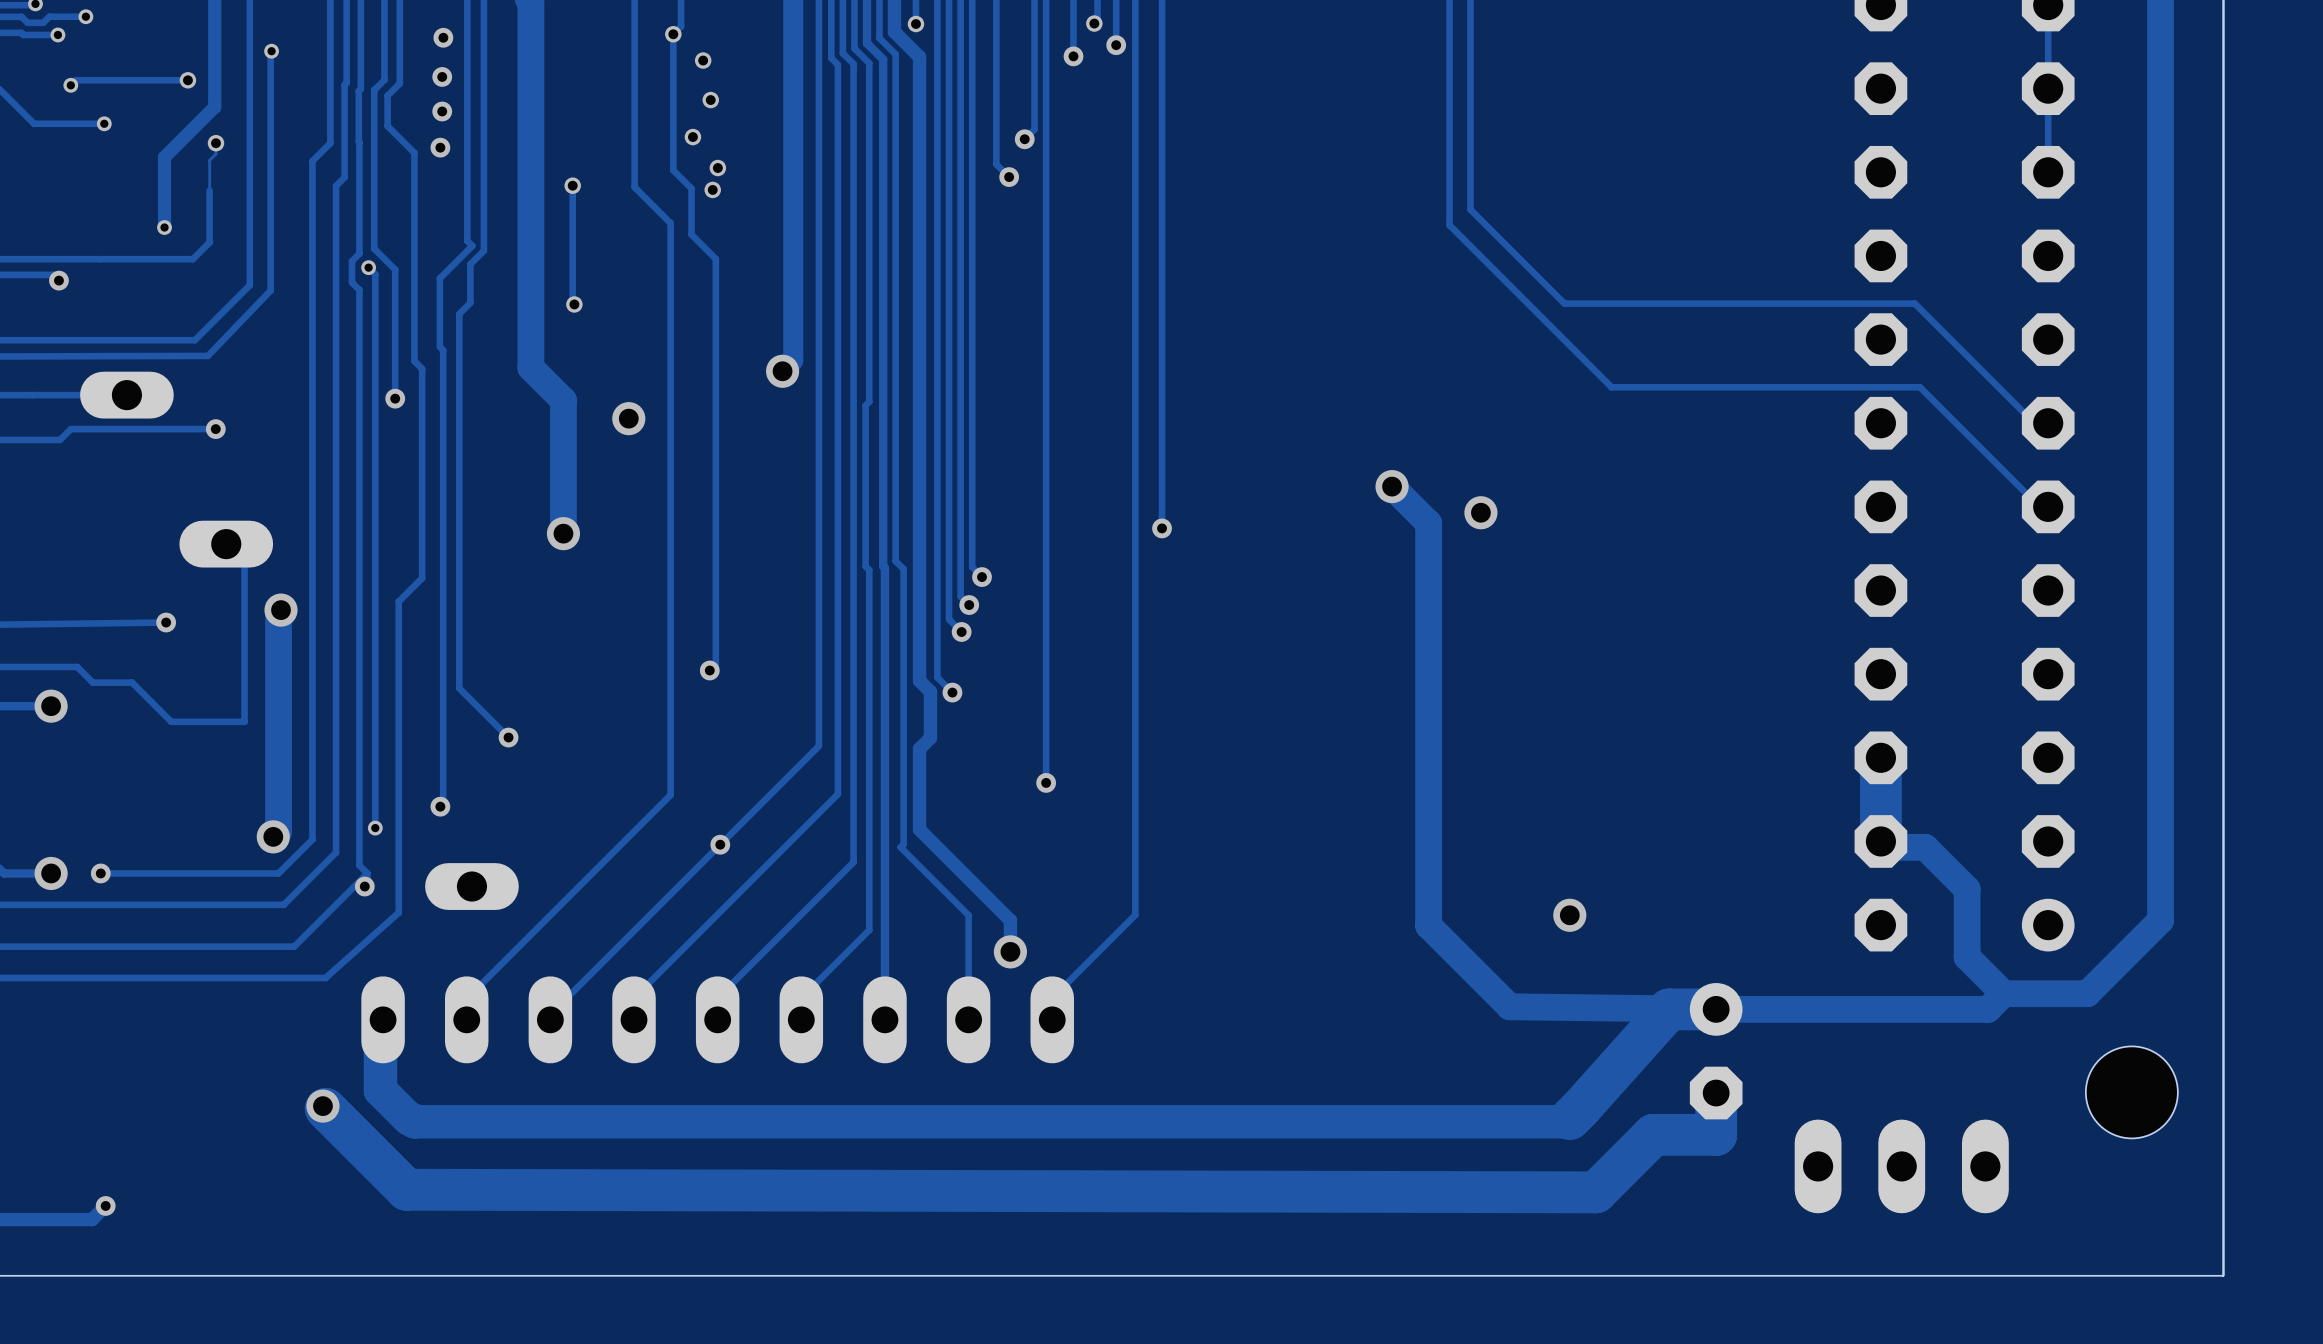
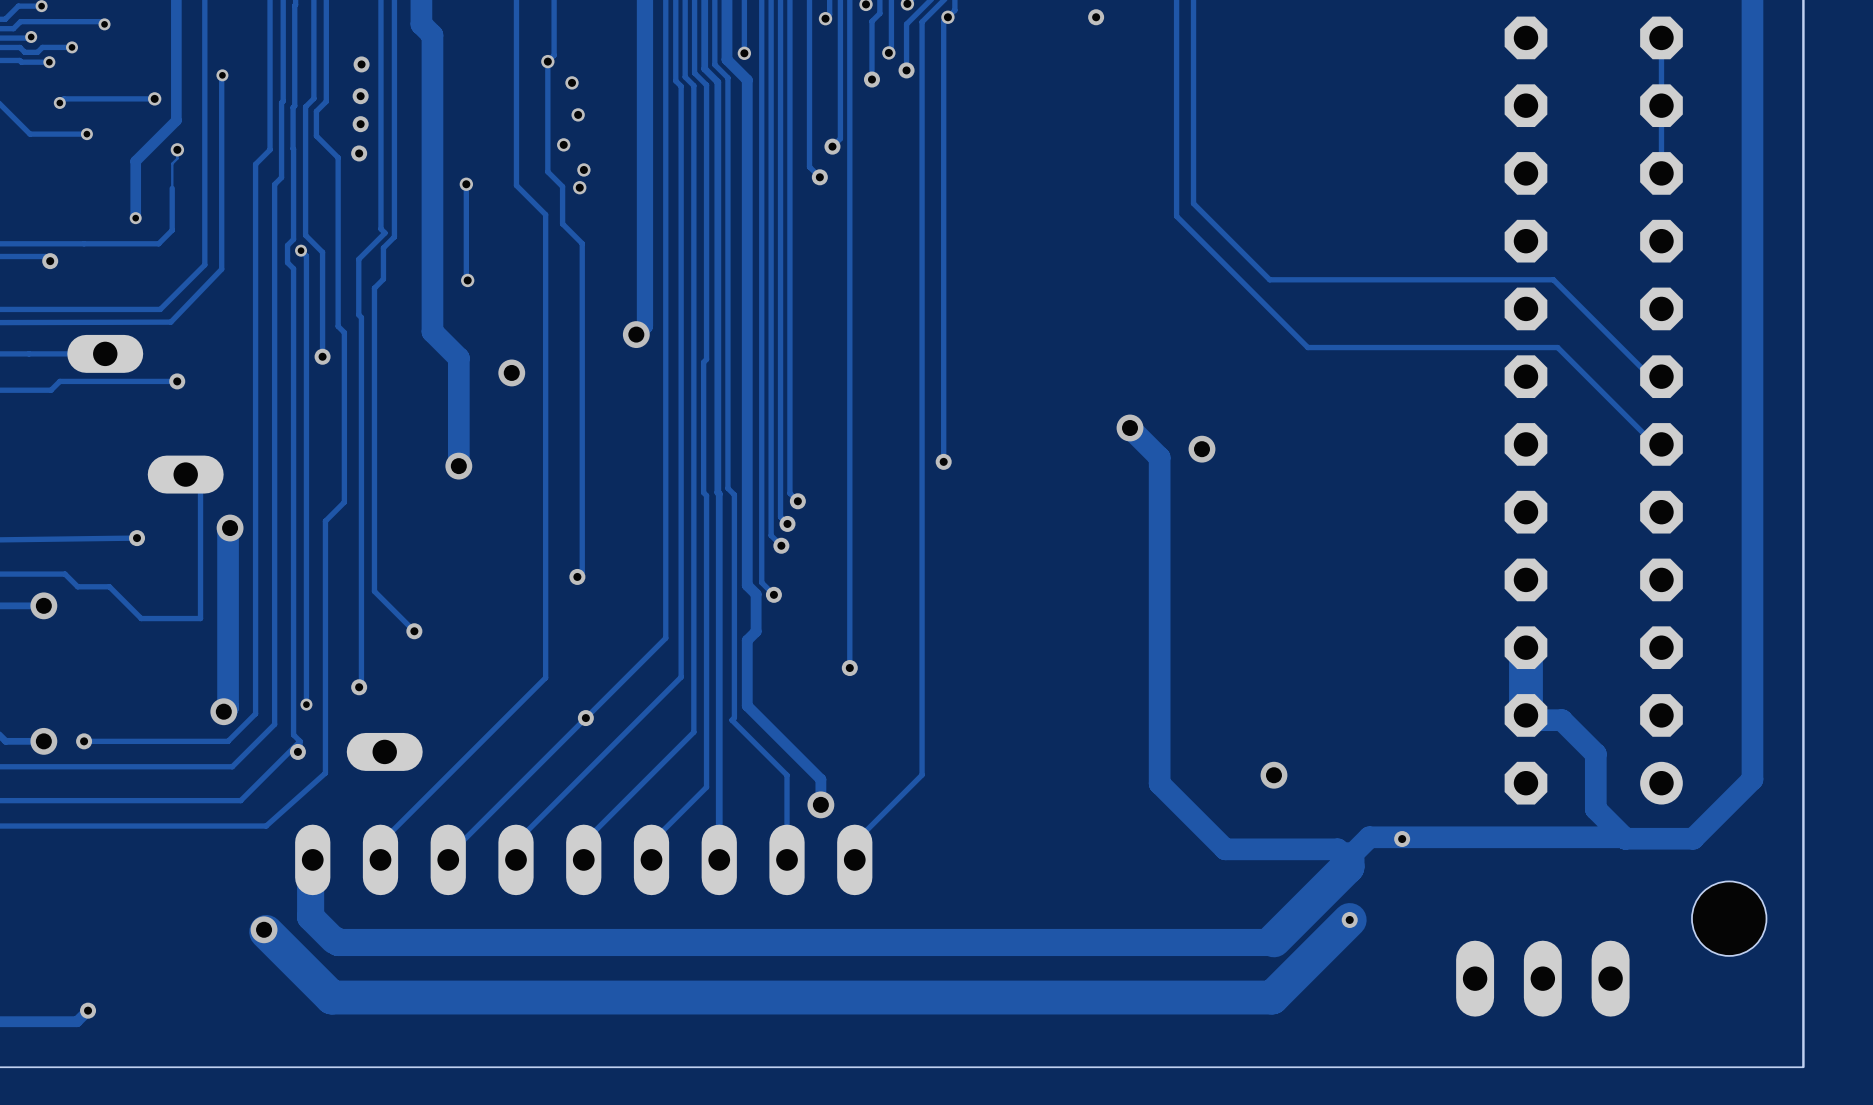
track: none -> (1623, 837) (1369, 837) (1347, 859)
track: (2003, 993) (1988, 1009) (1716, 1009) -> none
via: none -> (1402, 839)
track: (1509, 1006) (1716, 1009) -> (1225, 849) (1337, 849) (1347, 859)
track: (1716, 1009) (1669, 1009) (1580, 1108) -> (1347, 859) (1347, 866) (1282, 931)
part: (1716, 1051) -> none
via: none -> (1349, 919)
track: (1716, 1093) (1716, 1134) (1653, 1134) (1595, 1192) (406, 1189) -> (1349, 919) (1272, 997) (331, 997)

